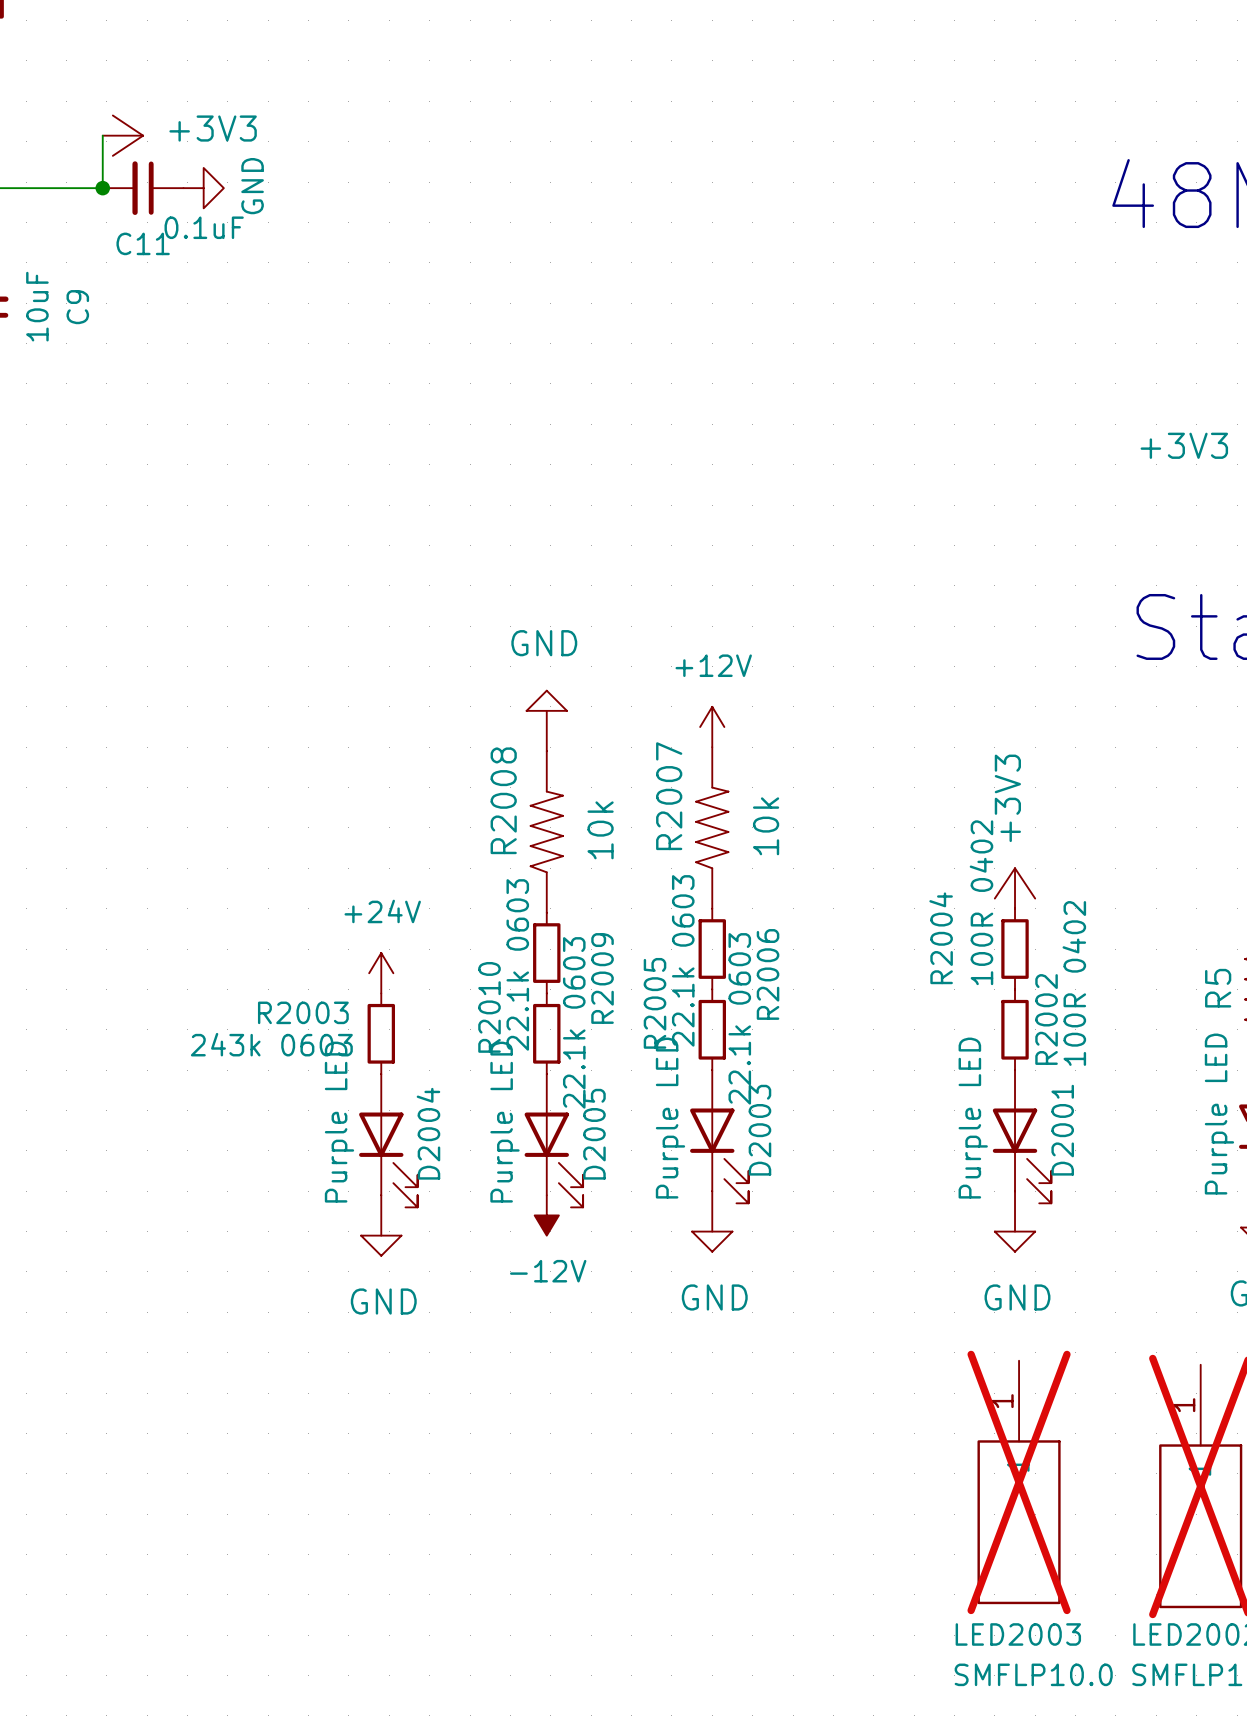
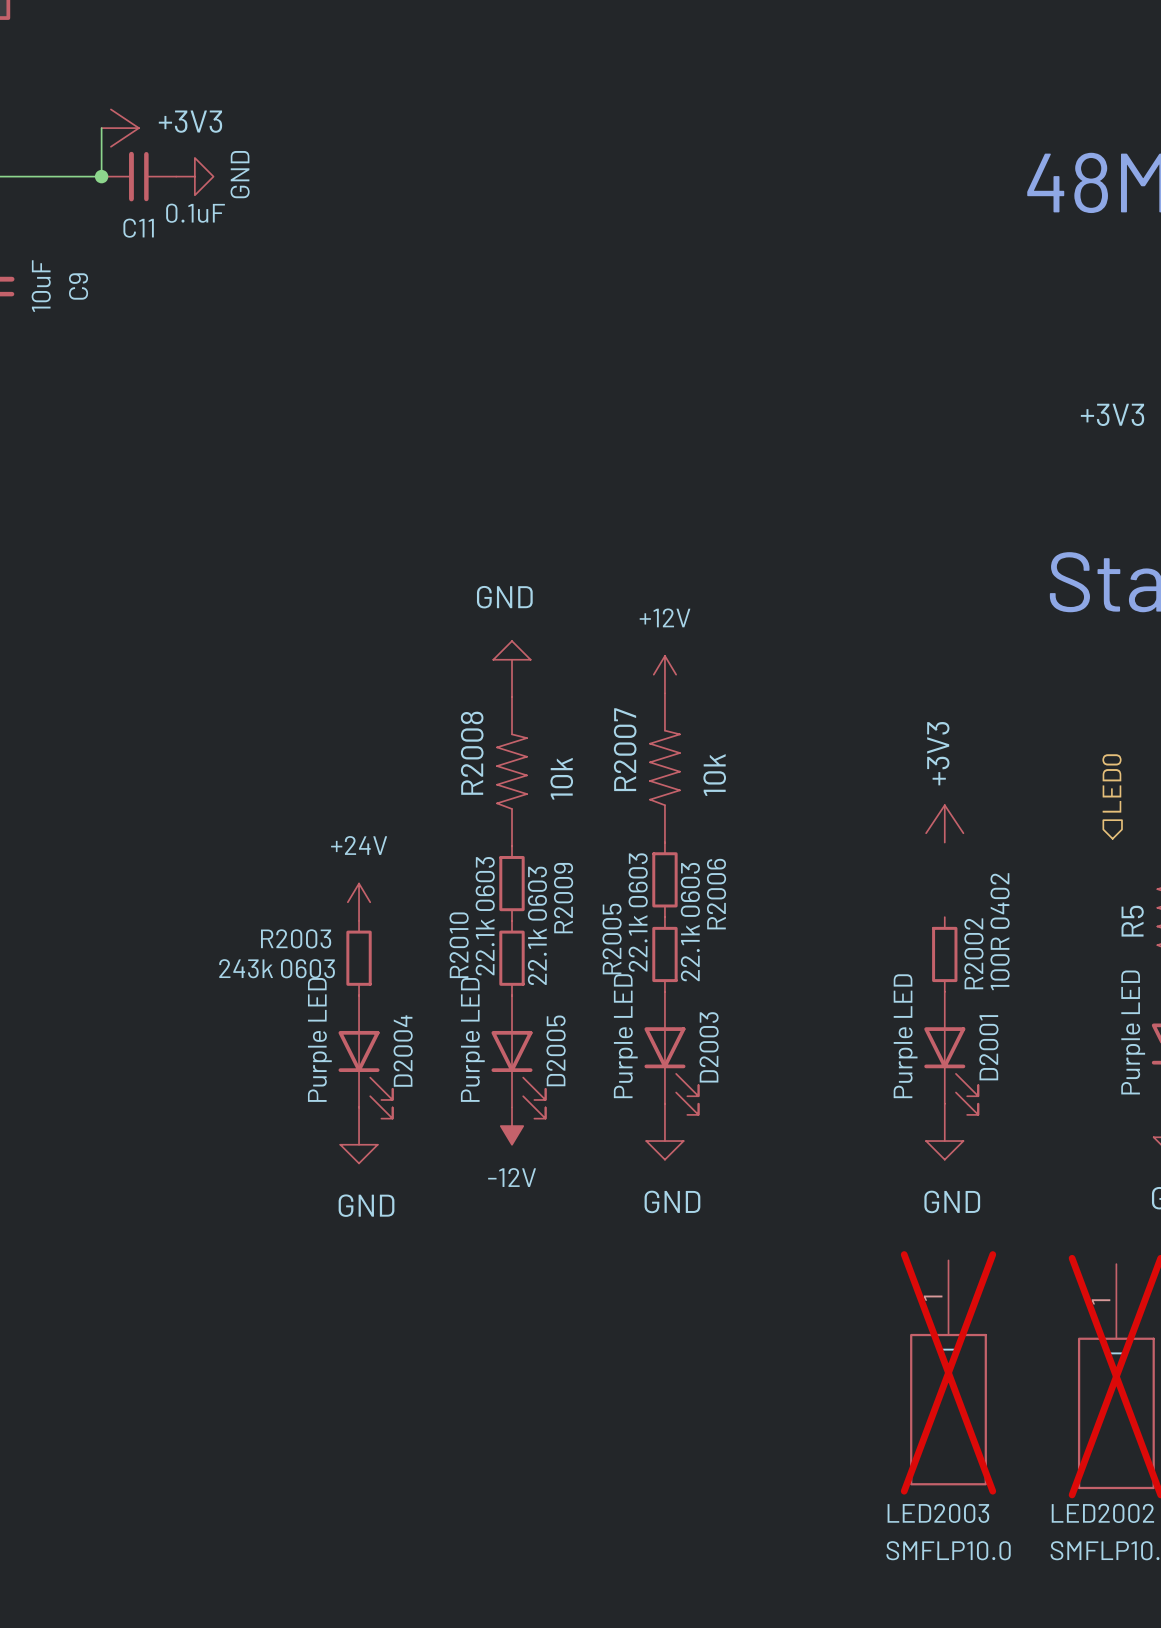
hierarchical label: none -> LED0 (1111, 783)
R2004: 100R 0402 (1015, 949) -> none

